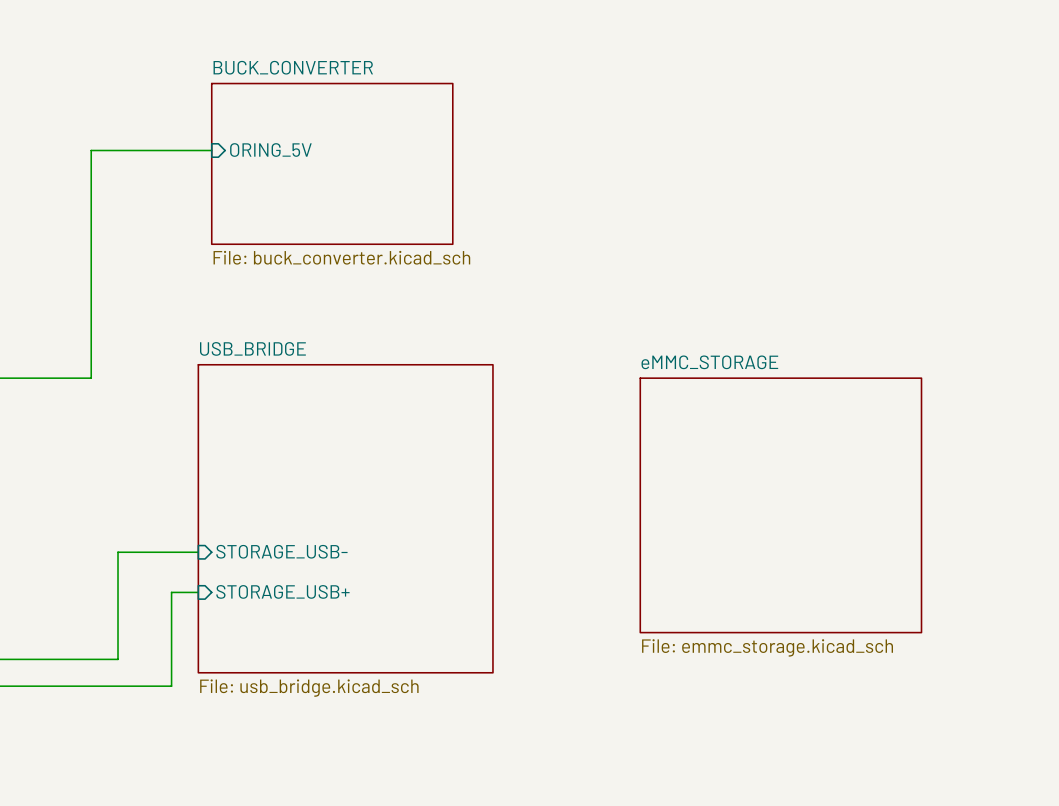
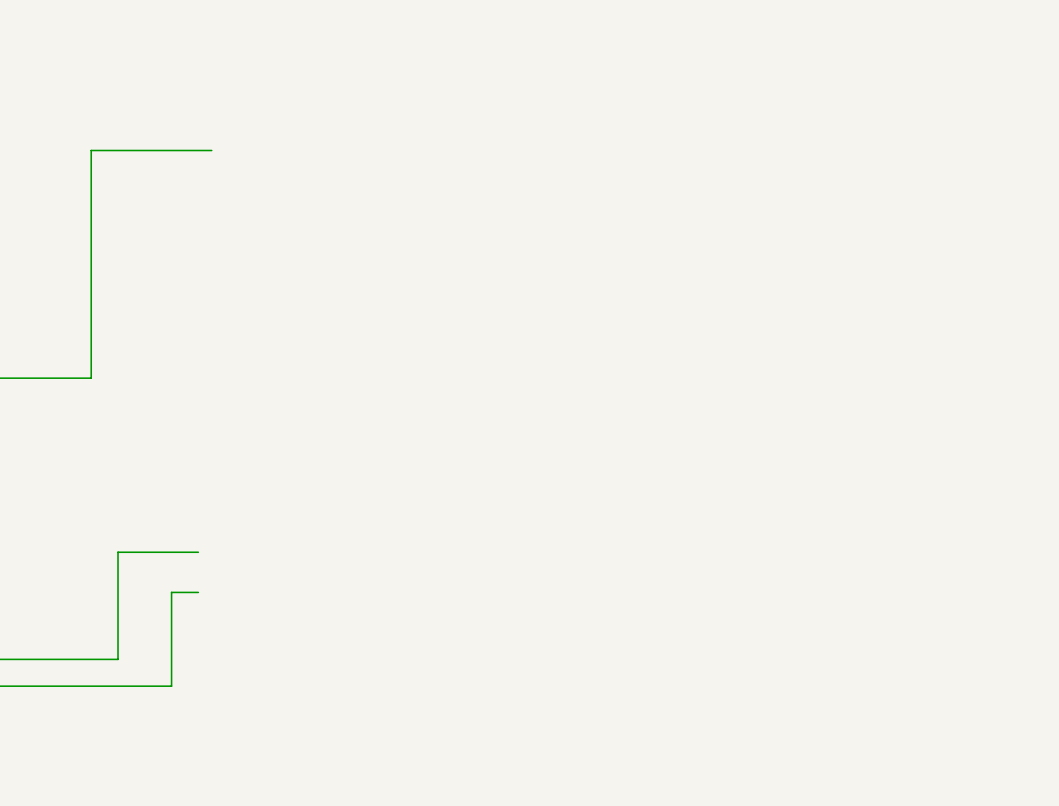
sheet pin: ORING_5V (270, 150) -> none
sheet BUCK_CONVERTER: File: buck_converter.kicad_sch (332, 163) -> none
sheet eMMC_STORAGE: File: emmc_storage.kicad_sch (780, 505) -> none
sheet USB_BRIDGE: File: usb_bridge.kicad_sch (345, 518) -> none
sheet pin: STORAGE_USB- (281, 551) -> none
sheet pin: STORAGE_USB+ (282, 591) -> none

